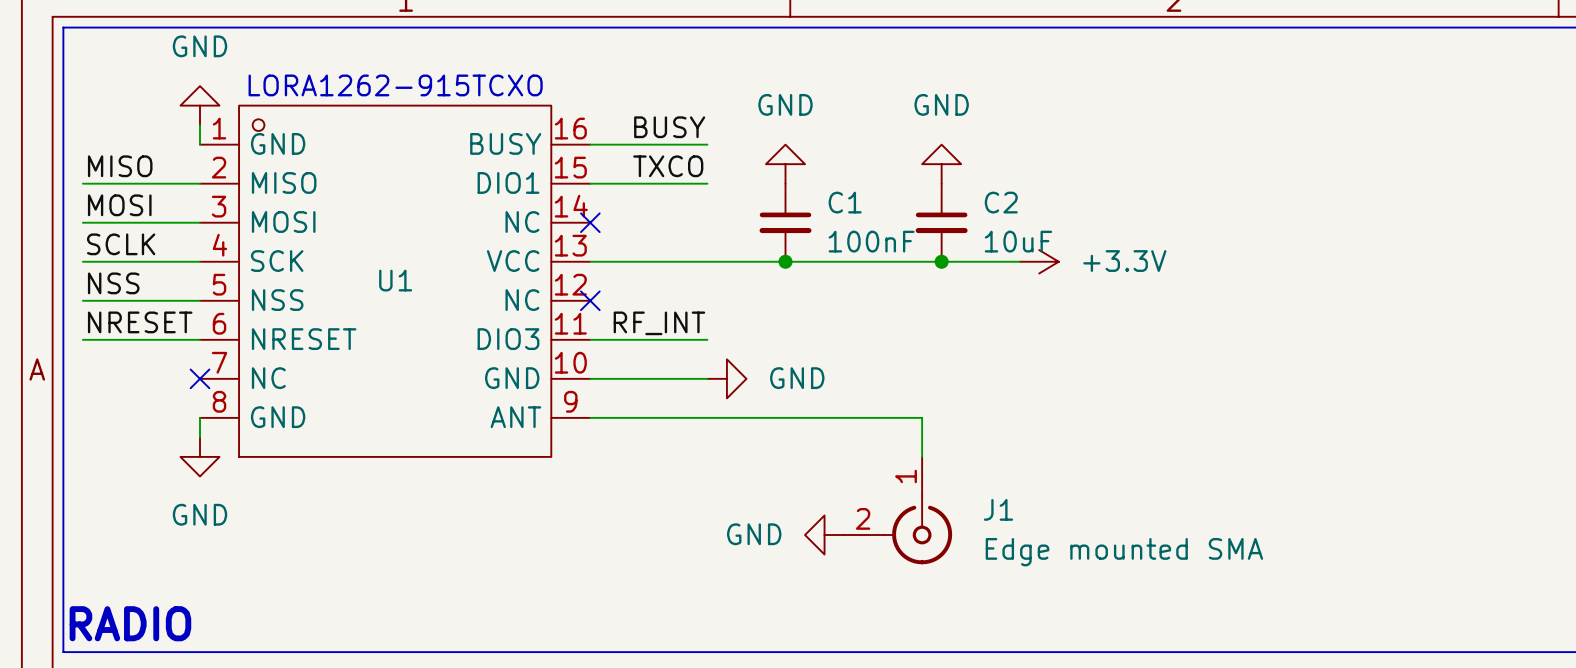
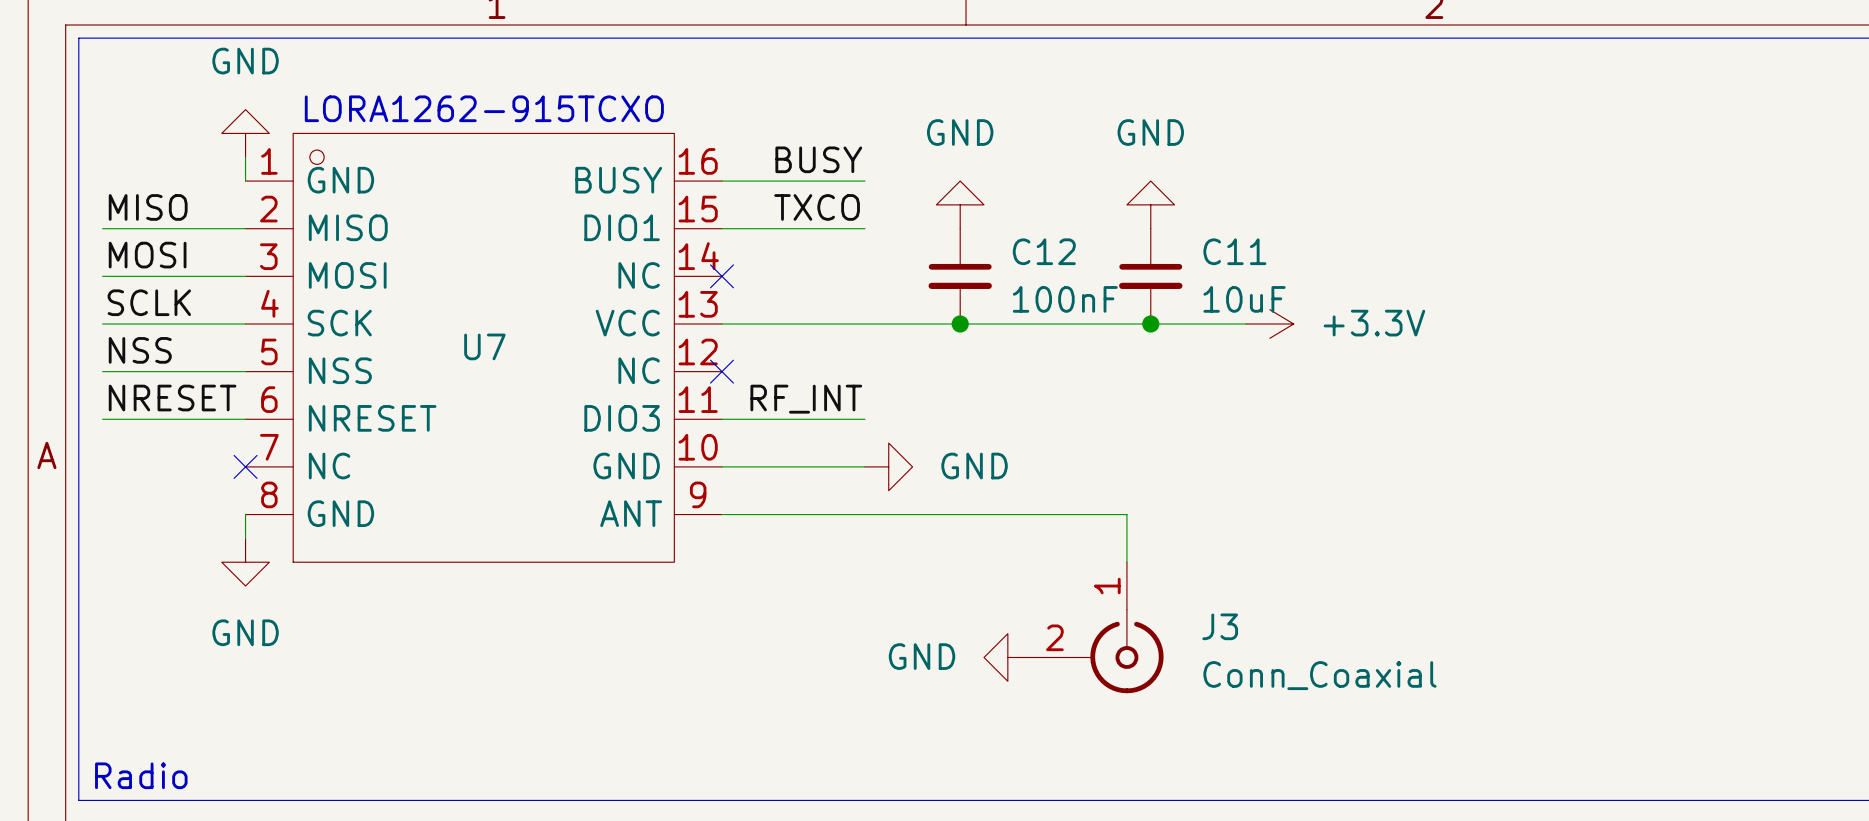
C1 name: C1 (845, 202) -> C12 (1044, 251)
C2 name: C2 (1001, 202) -> C11 (1234, 251)
U1 name: U1 (395, 280) -> U7 (484, 346)
J1 name: J1 (998, 509) -> J3 (1220, 626)
J1 value: Edge mounted SMA (1124, 552) -> Conn_Coaxial (1319, 675)
text: RADIO (130, 623) -> none
text: none -> Radio (141, 775)

